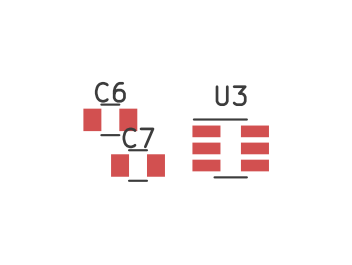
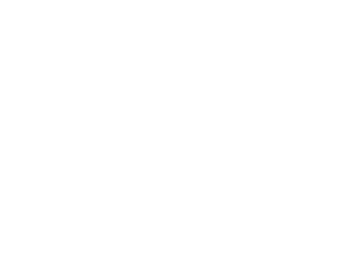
C6: (110, 119) -> none
U3: (230, 148) -> none
C7: (138, 165) -> none

